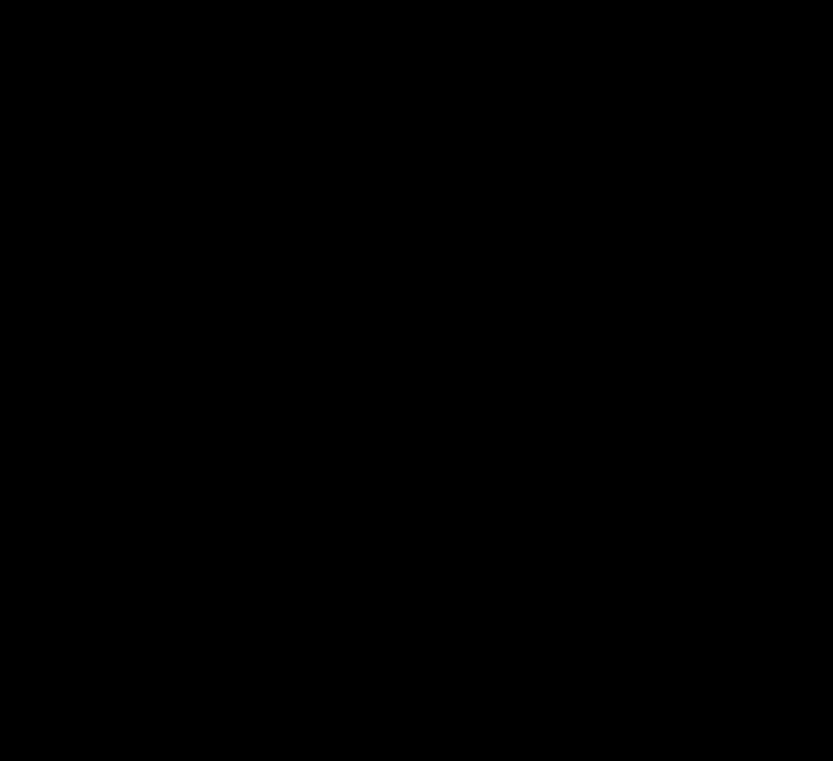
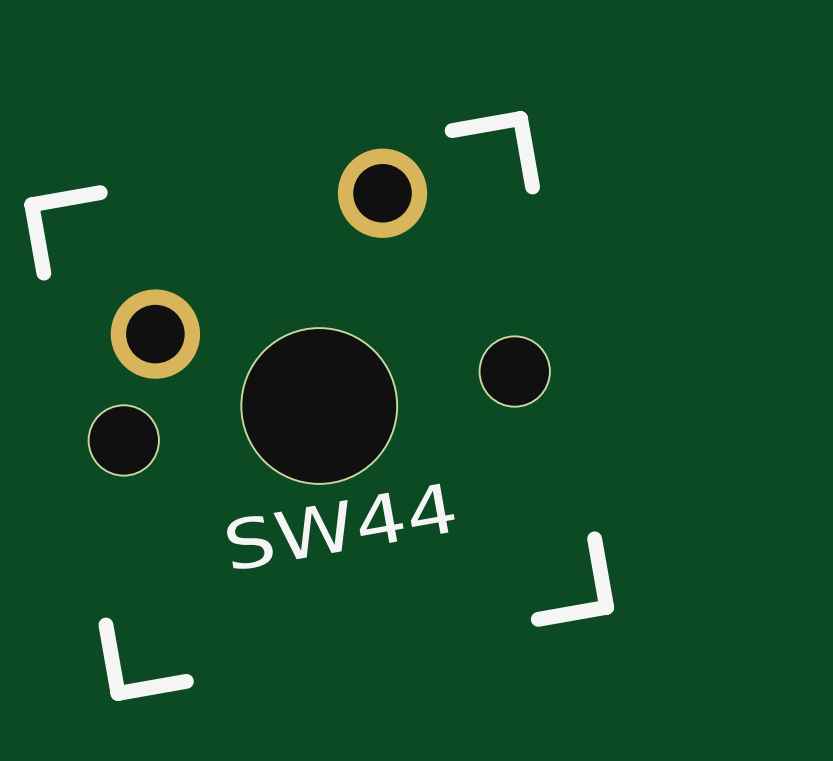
SW44: none -> (319, 405)

